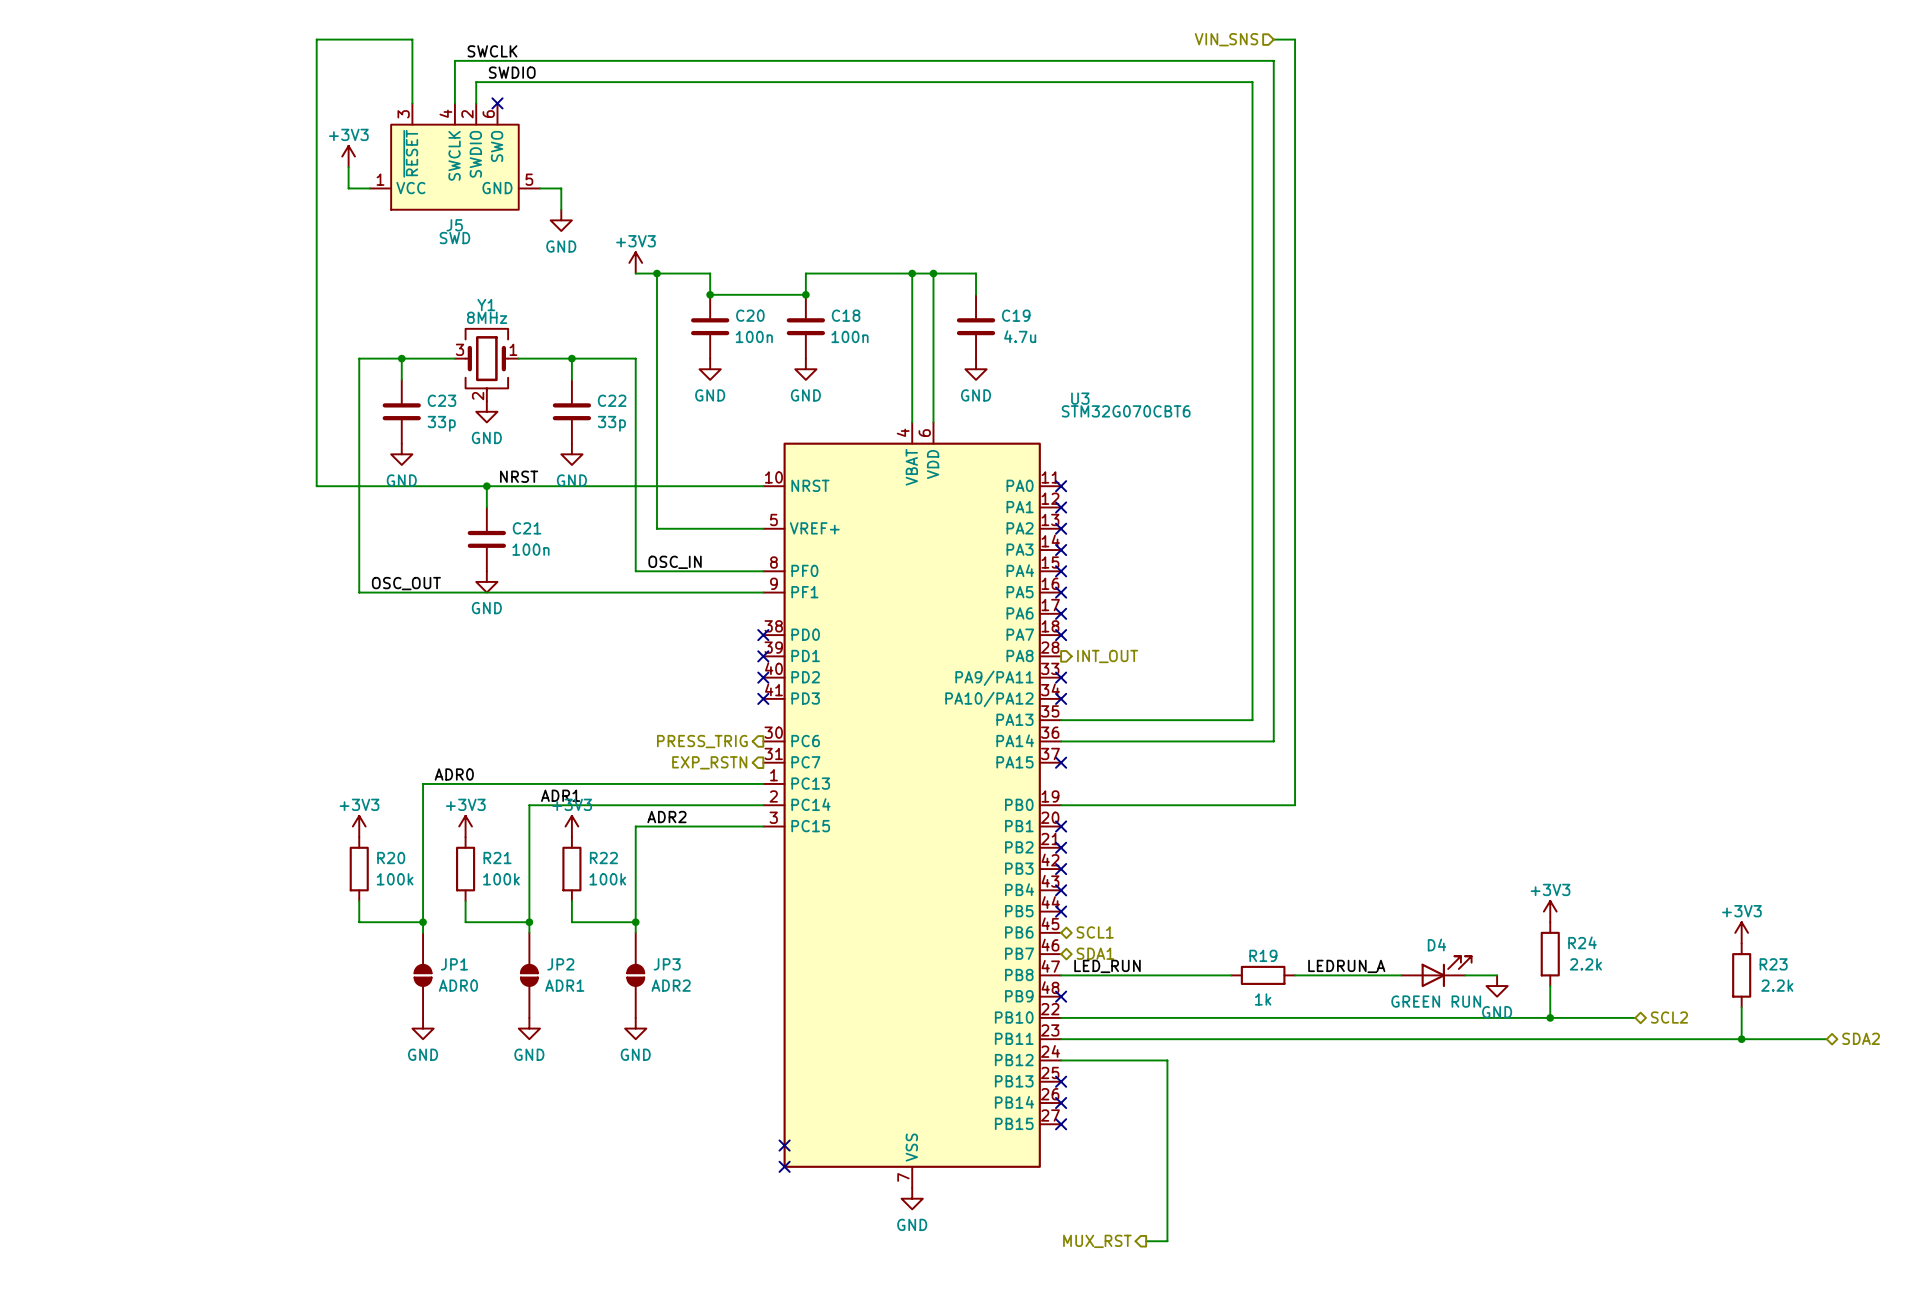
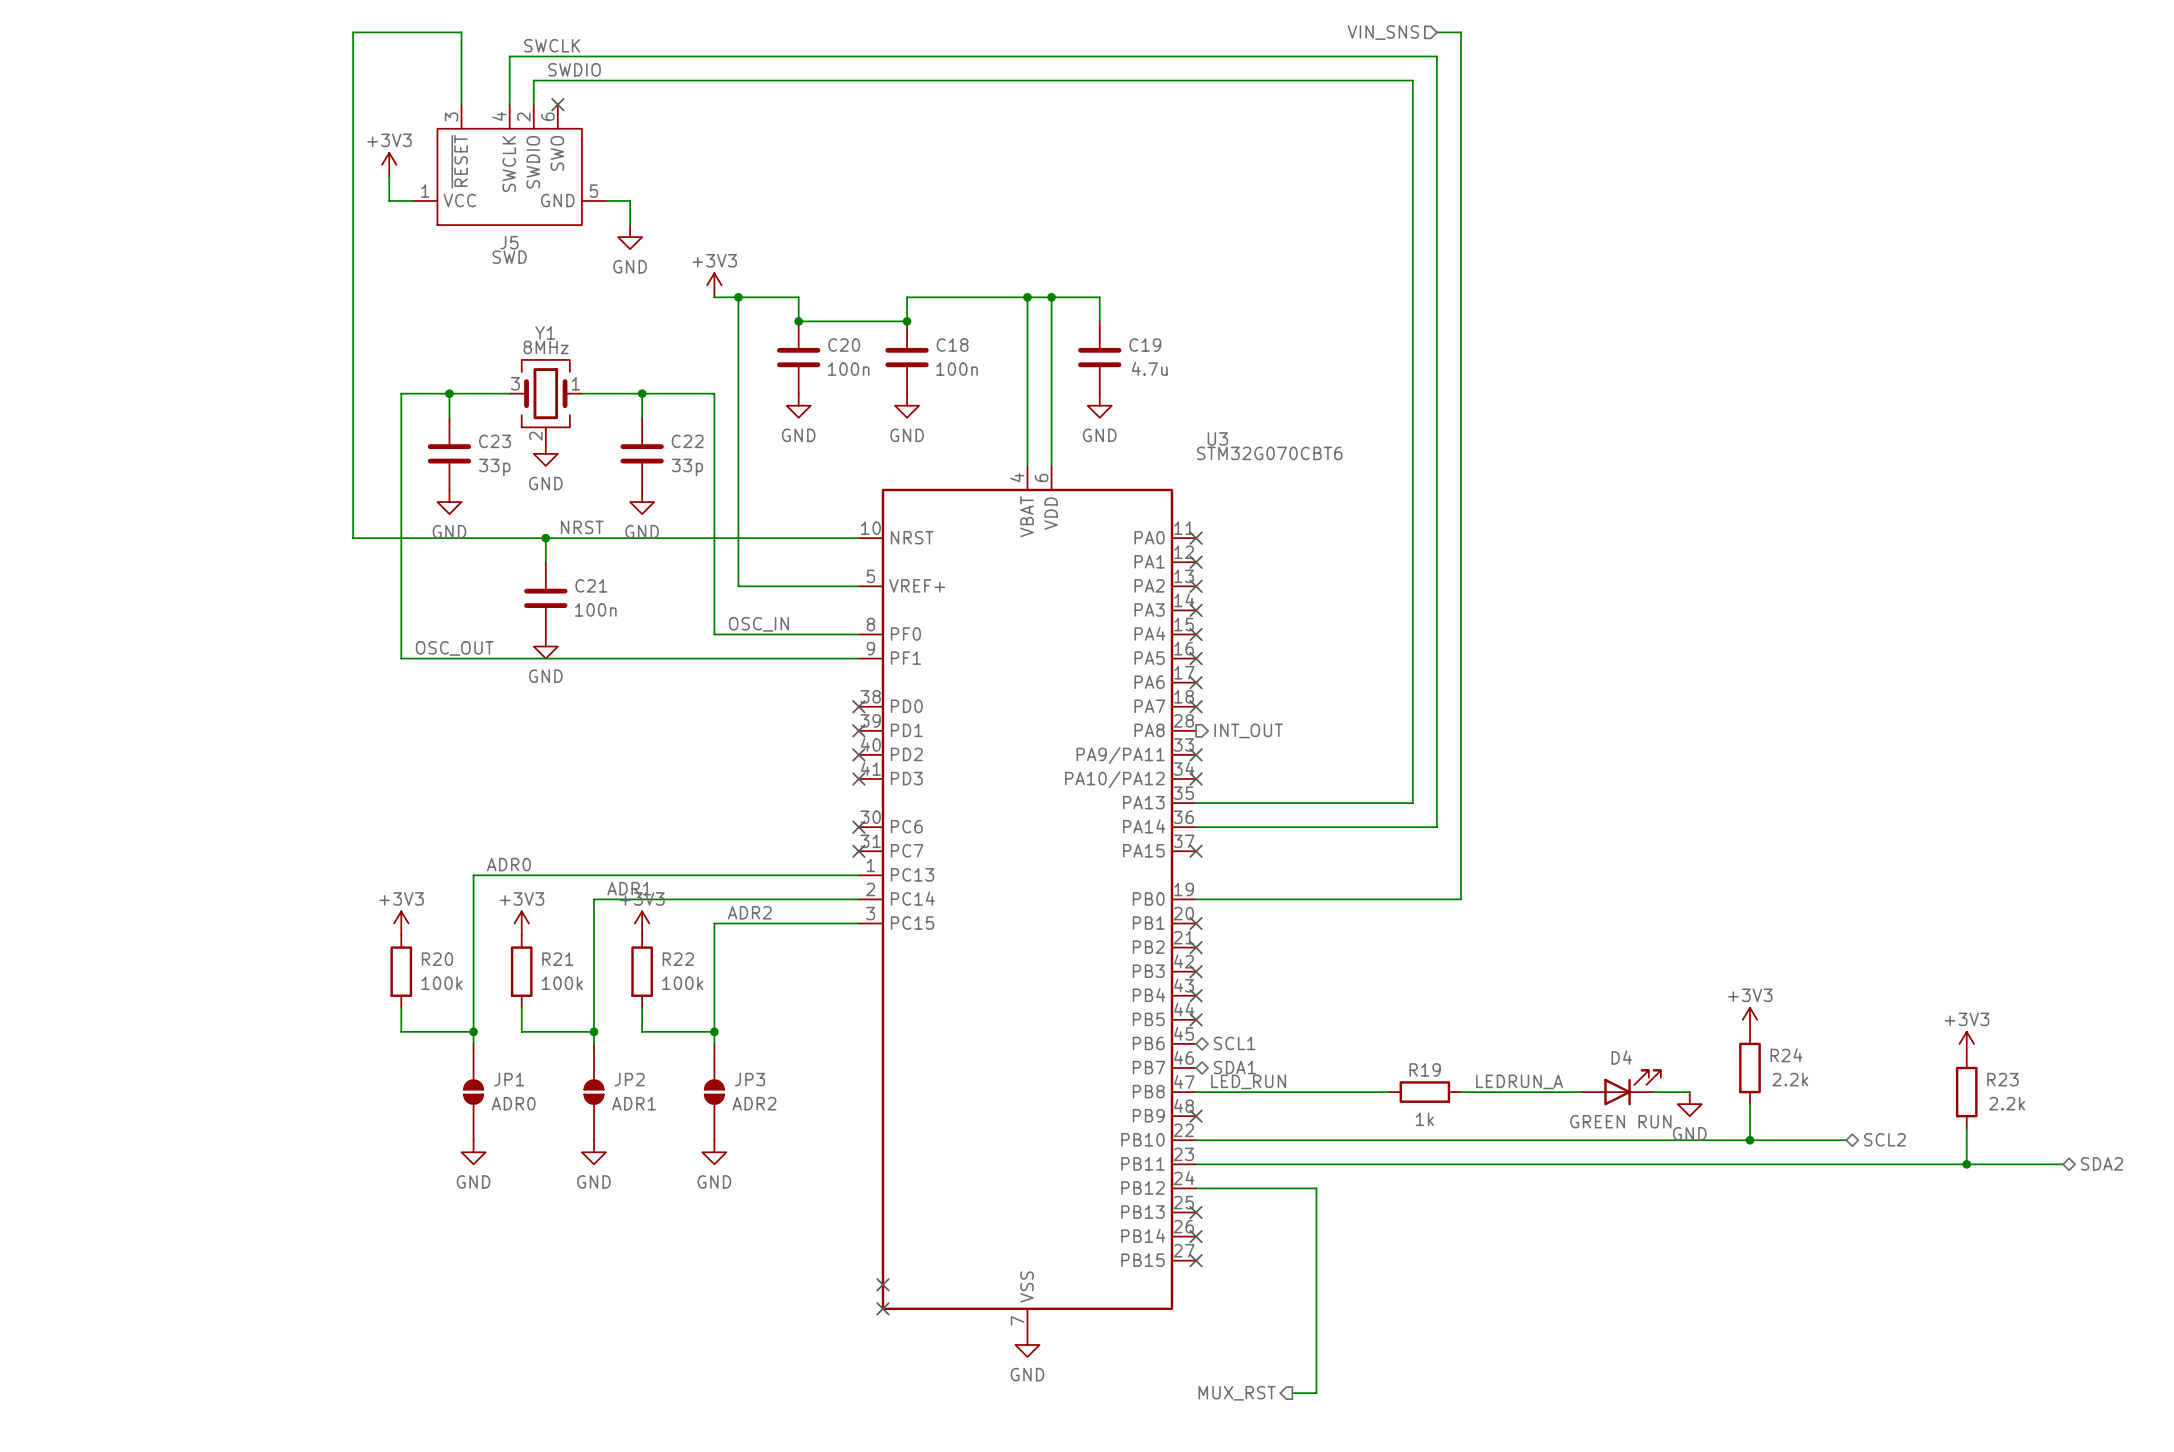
hierarchical label: PRESS_TRIG (702, 741) -> none
no-connect mark: none -> (858, 827)
hierarchical label: EXP_RSTN (709, 762) -> none
no-connect mark: none -> (858, 851)

